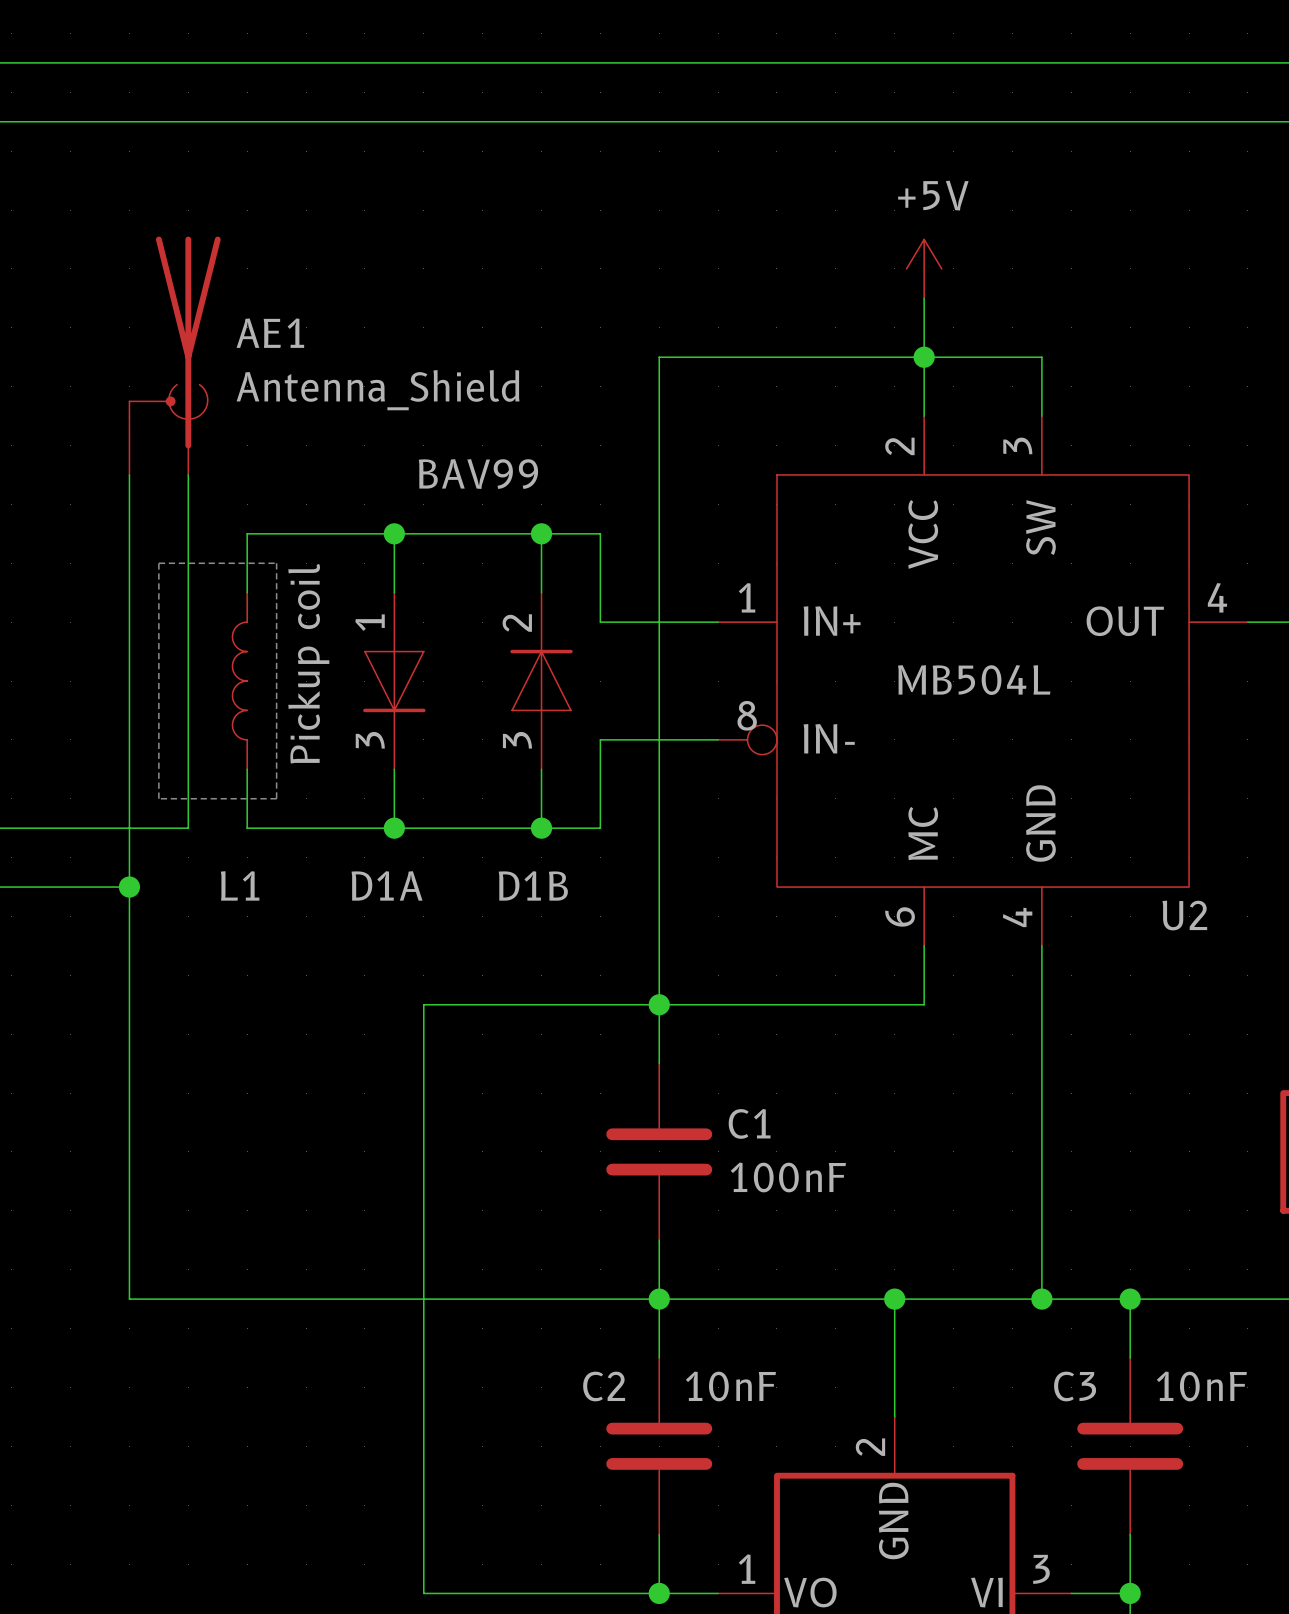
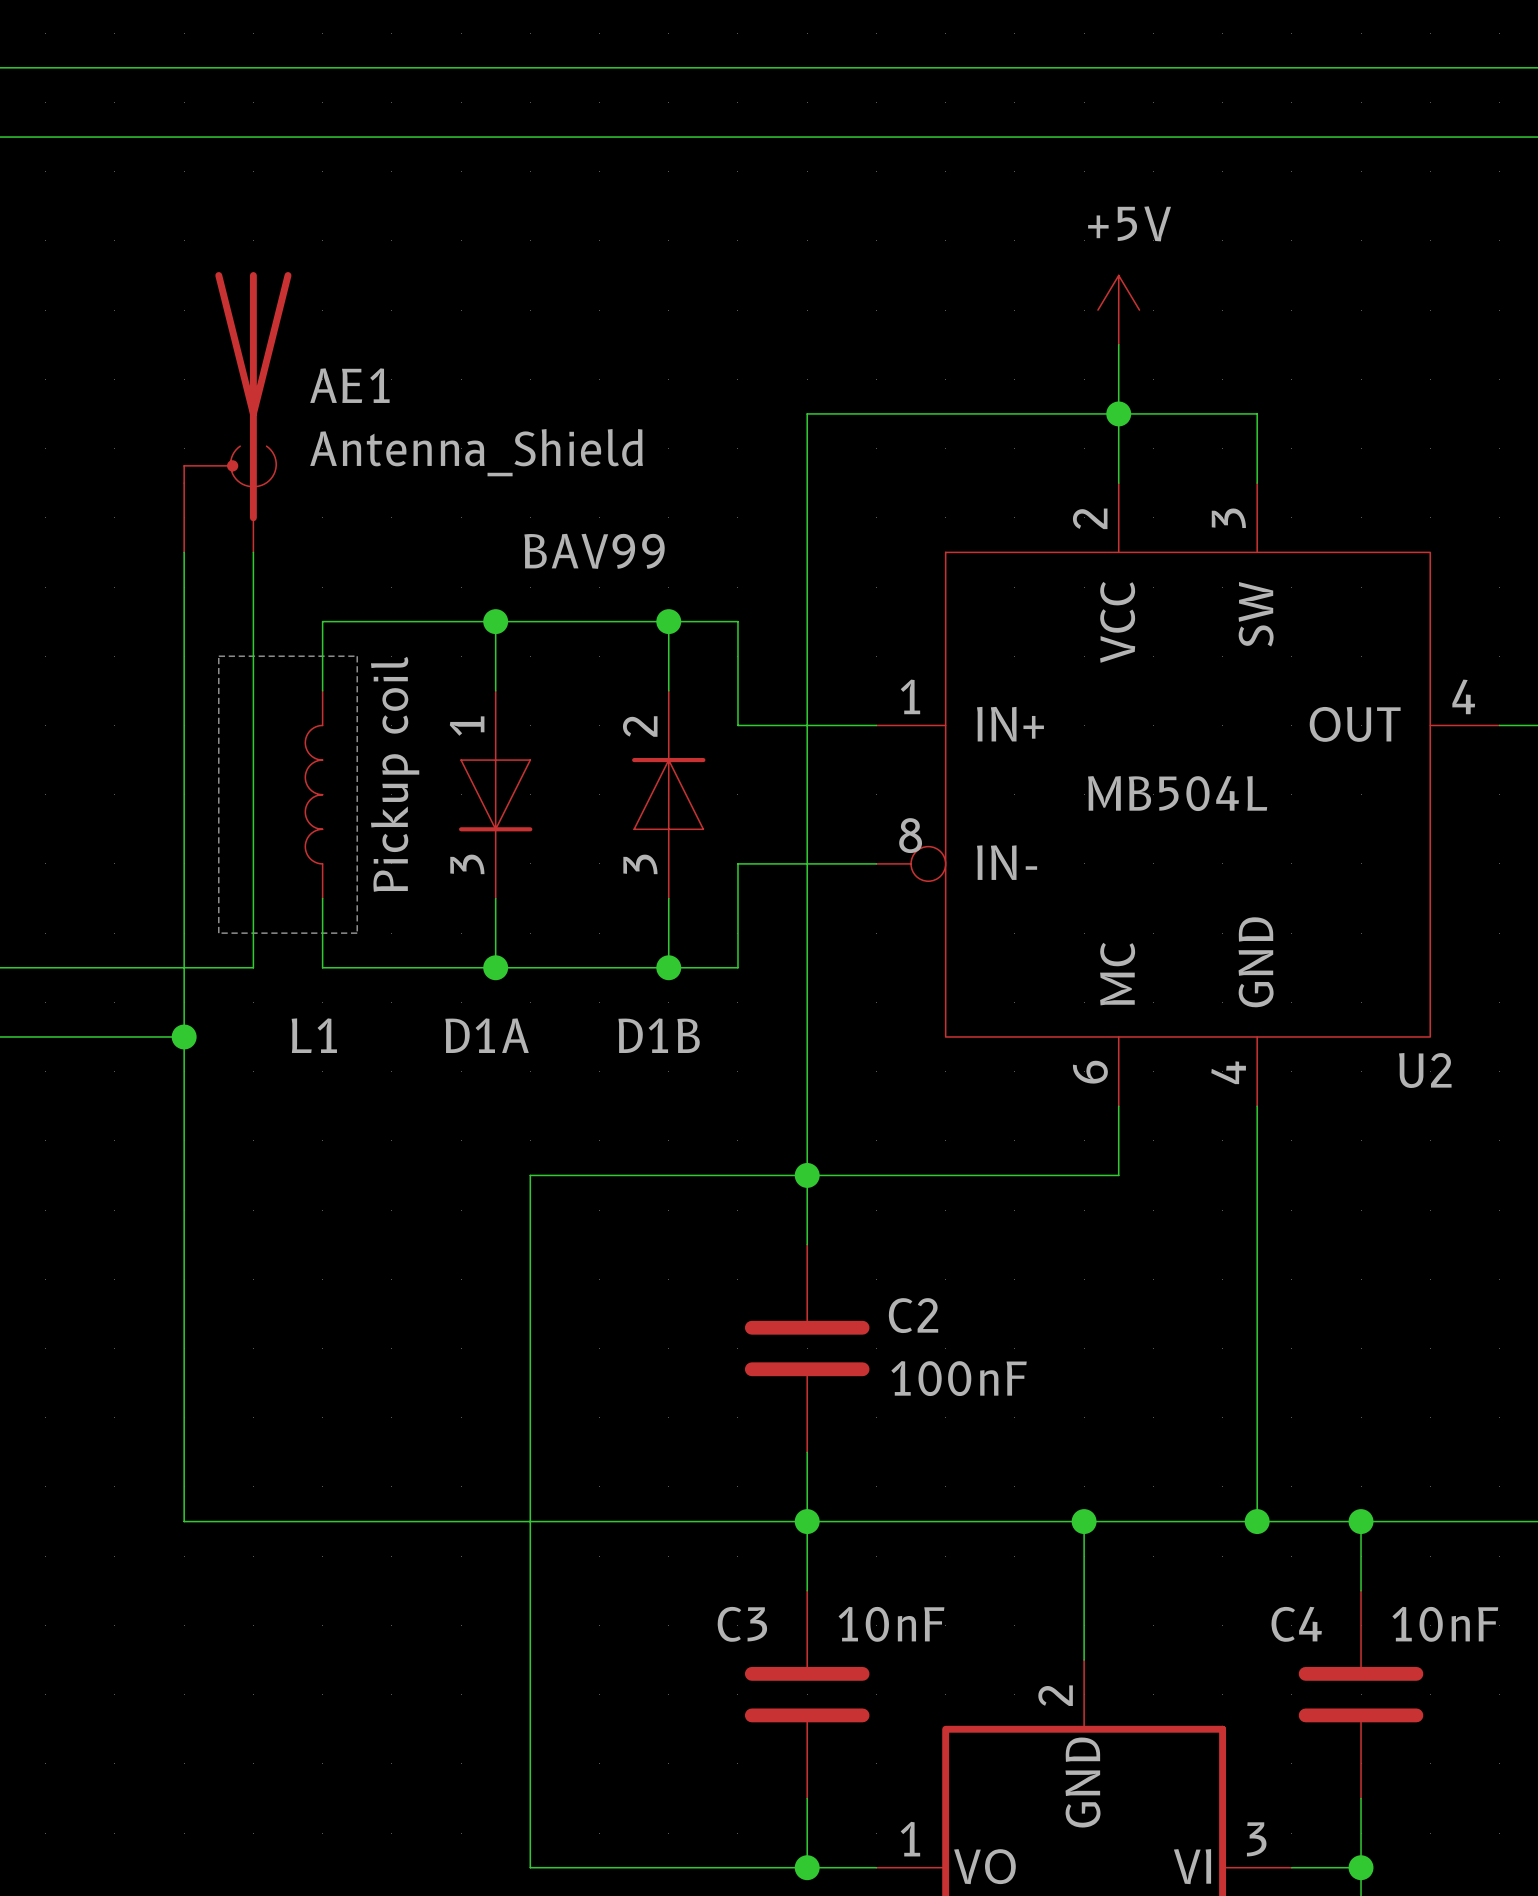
C1 name: C1 (749, 1123) -> C2 (913, 1315)
C2 name: C2 (604, 1386) -> C3 (742, 1624)
C3 name: C3 (1075, 1386) -> C4 (1296, 1624)

